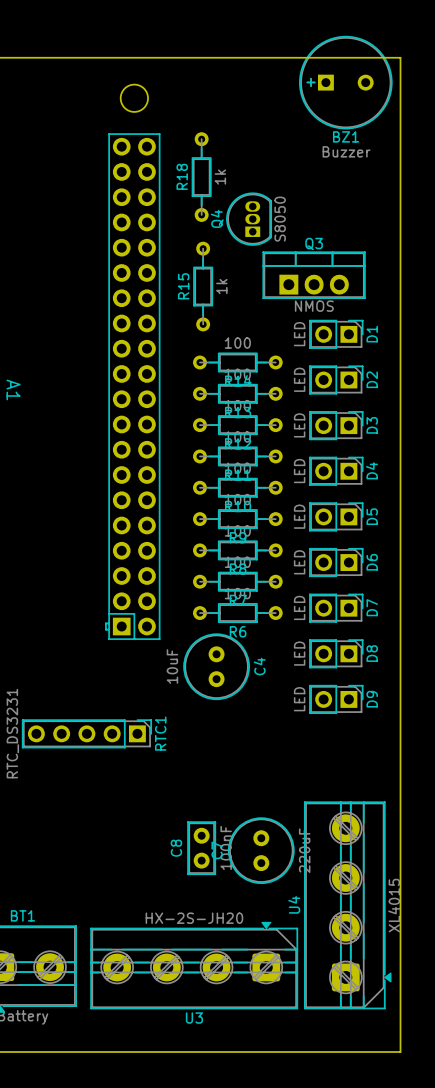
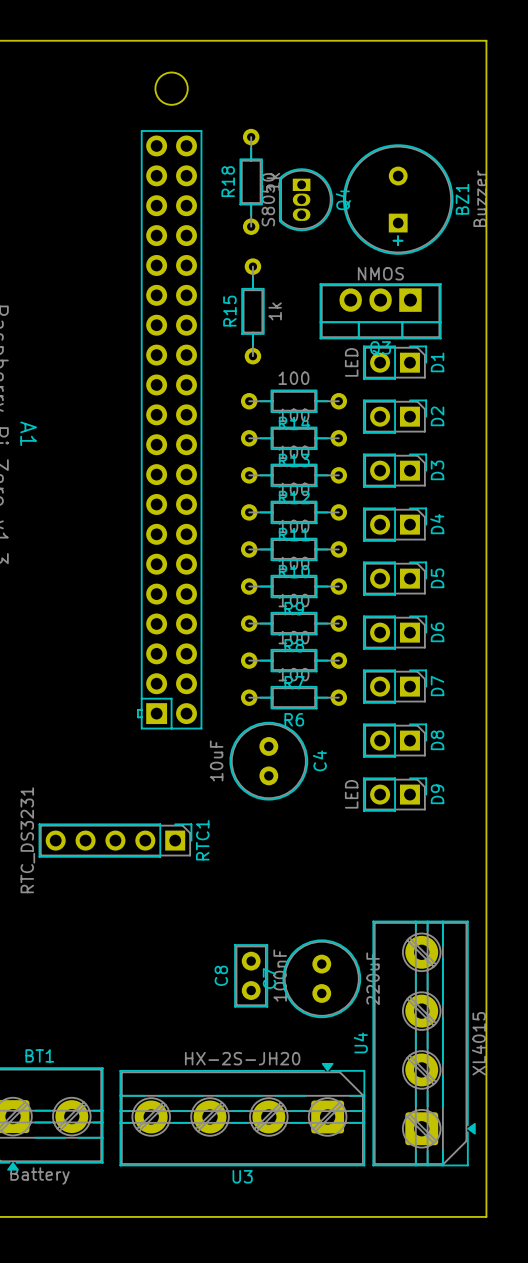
BZ1 rotation: 0° (345, 82) -> 90° counterclockwise (398, 199)
BZ1 position: (345, 82) -> (398, 199)
Q4 rotation: 0° (249, 219) -> 180° (306, 199)
Q3 rotation: 0° (314, 275) -> 180° (380, 311)
D1 position: (336, 334) -> (395, 362)
D2 value: LED (299, 379) -> none
D2 position: (336, 379) -> (395, 416)
D3 value: LED (299, 425) -> none
D3 position: (336, 425) -> (395, 470)
D4 value: LED (299, 471) -> none
D4 position: (336, 471) -> (395, 524)
D5 value: LED (299, 516) -> none
D5 position: (336, 516) -> (395, 578)
D6 value: LED (299, 562) -> none
D6 position: (336, 562) -> (395, 632)
D7 value: LED (299, 607) -> none
D7 position: (336, 608) -> (395, 686)
D8 value: LED (299, 653) -> none
D8 position: (336, 653) -> (395, 740)
D9 position: (336, 699) -> (395, 794)

